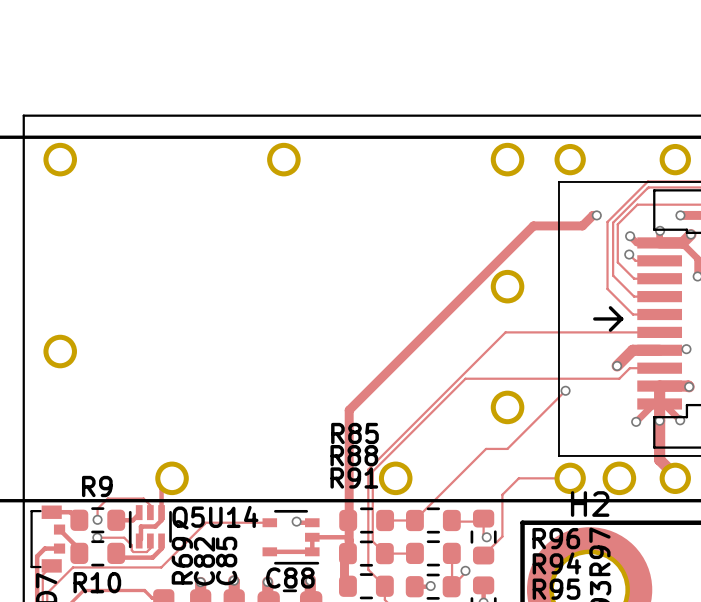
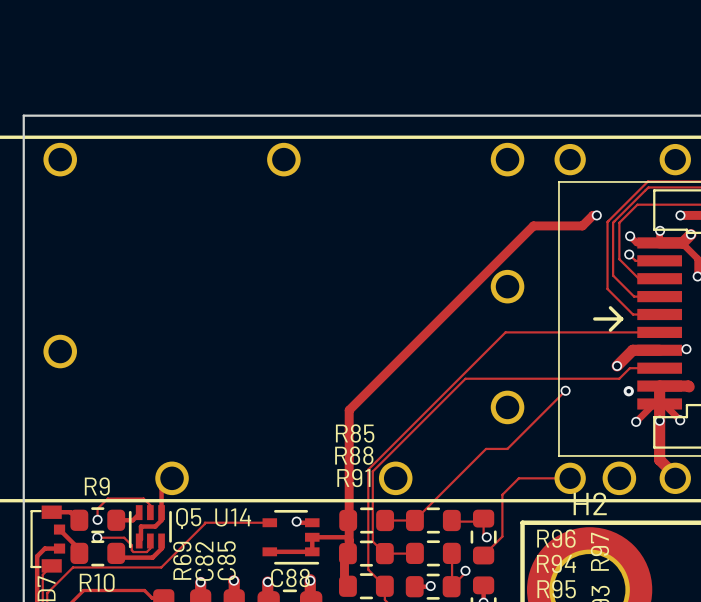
track: (619, 222) (617, 224) (617, 262) (634, 278) (659, 278) -> (619, 222) (619, 259) (638, 278)
via: (689, 386) -> none
via: none -> (628, 391)

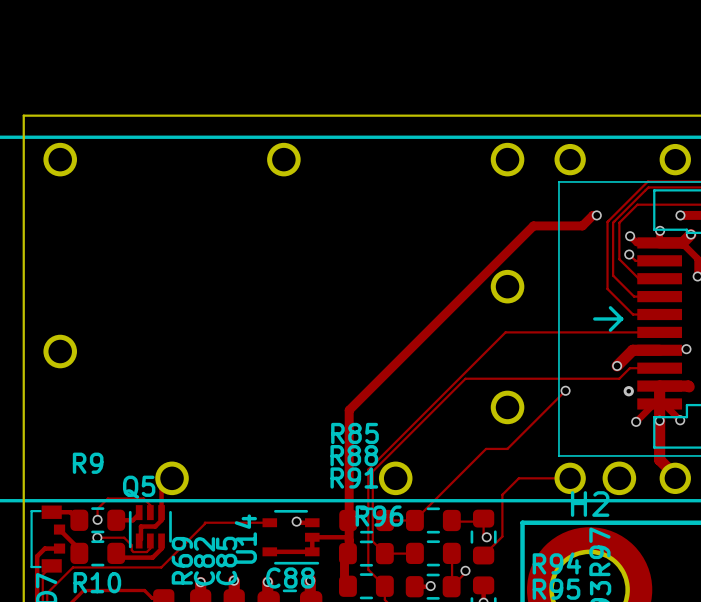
R9 name position: R9 (97, 486) -> R9 (88, 463)
U14 name rotation: 0° (233, 517) -> 90° counterclockwise (245, 539)
Q5 name position: Q5 (188, 518) -> Q5 (139, 487)
R96 name position: R96 (556, 538) -> R96 (379, 516)

